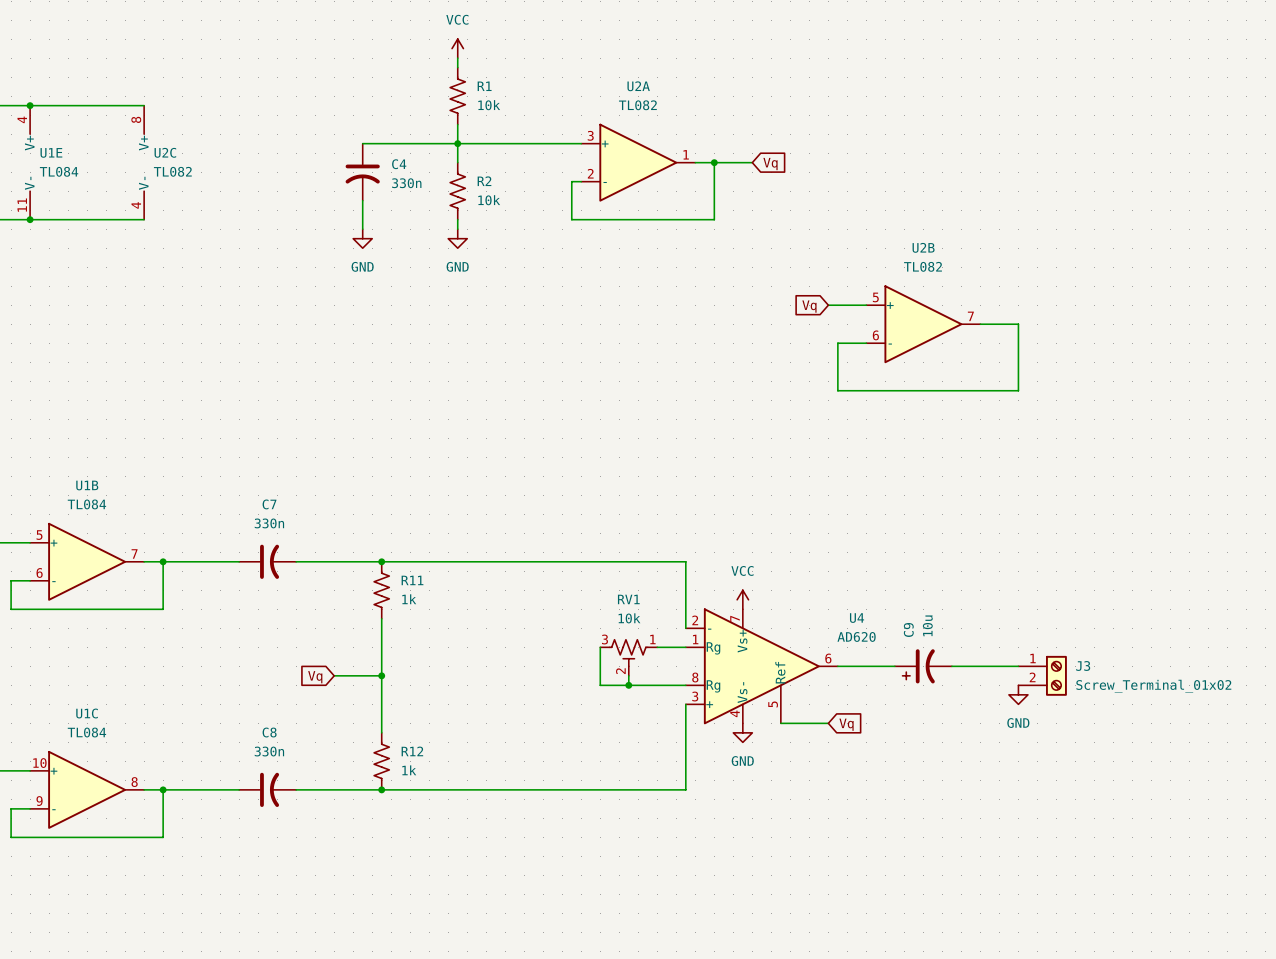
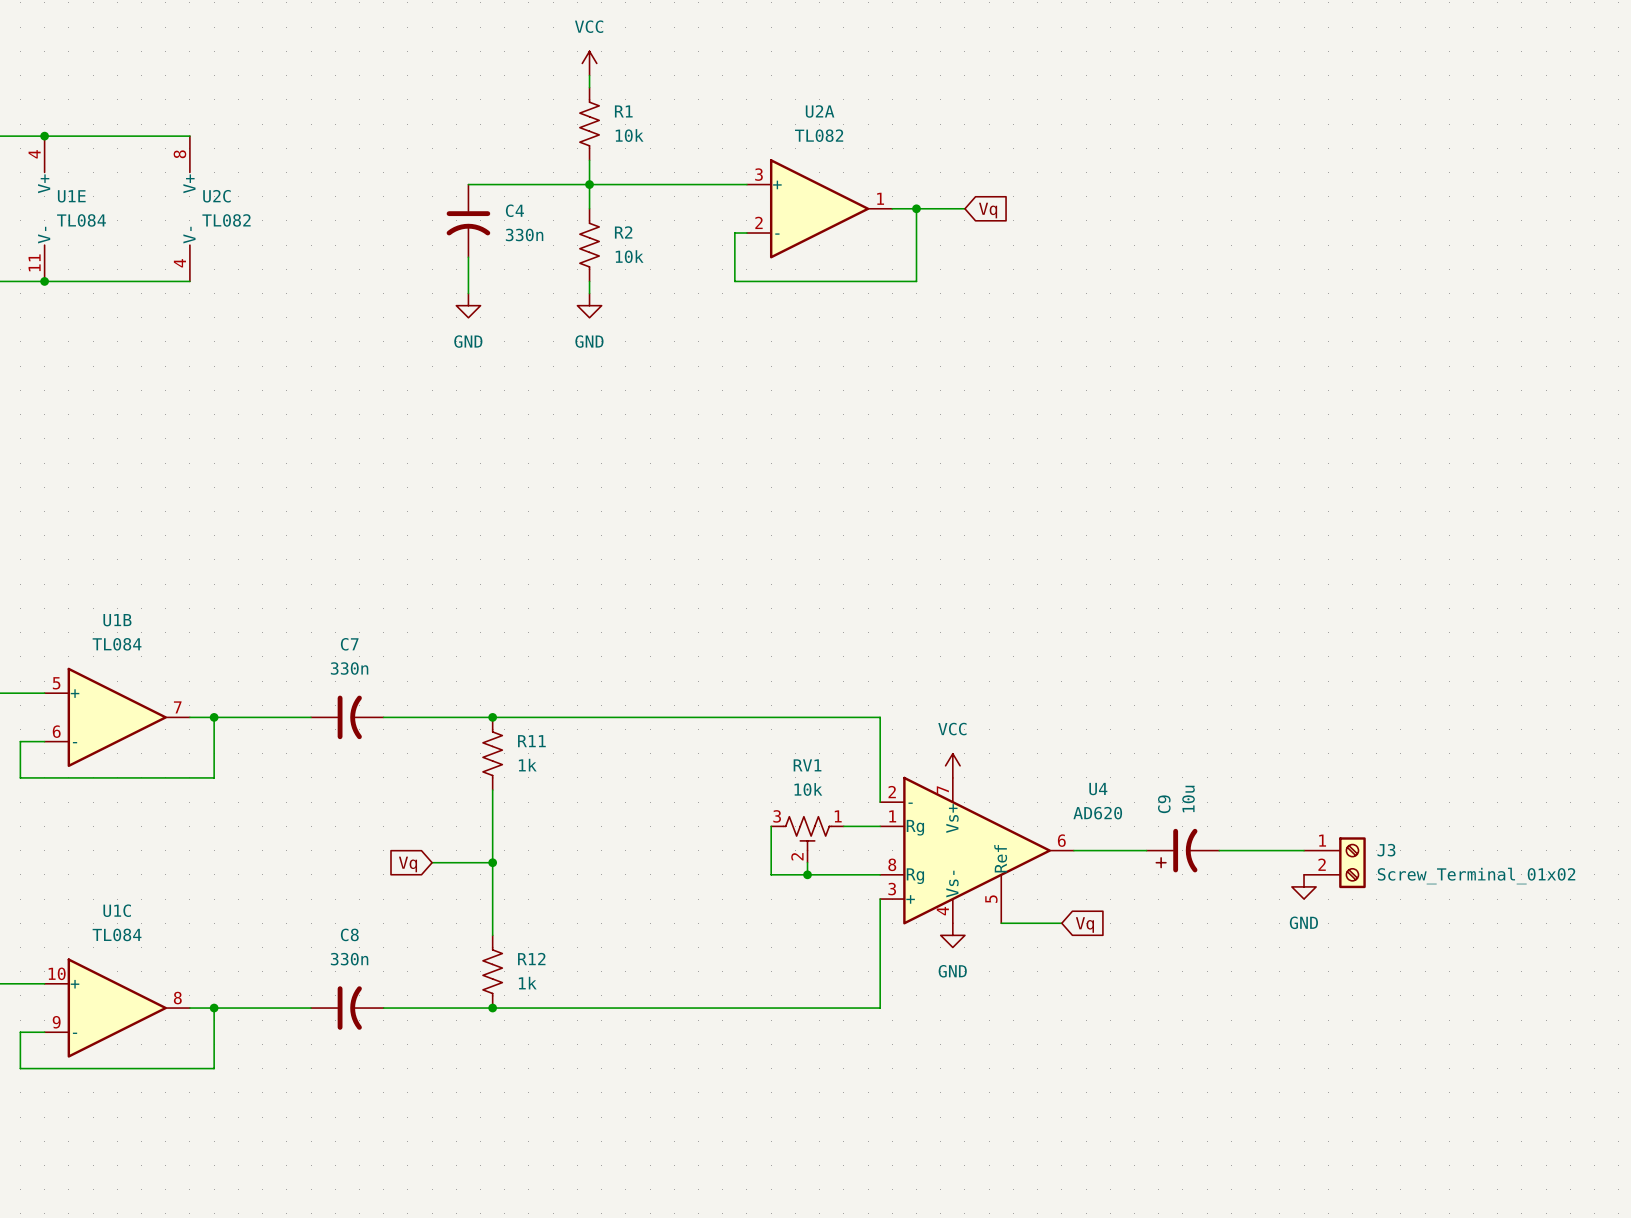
wire: (828, 305) (866, 305) -> none
global label: Vq (809, 306) -> none
U2B: TL082 (923, 324) -> none
wire: (980, 324) (1018, 324) (1018, 390) (837, 390) (837, 343) (866, 343) -> none

